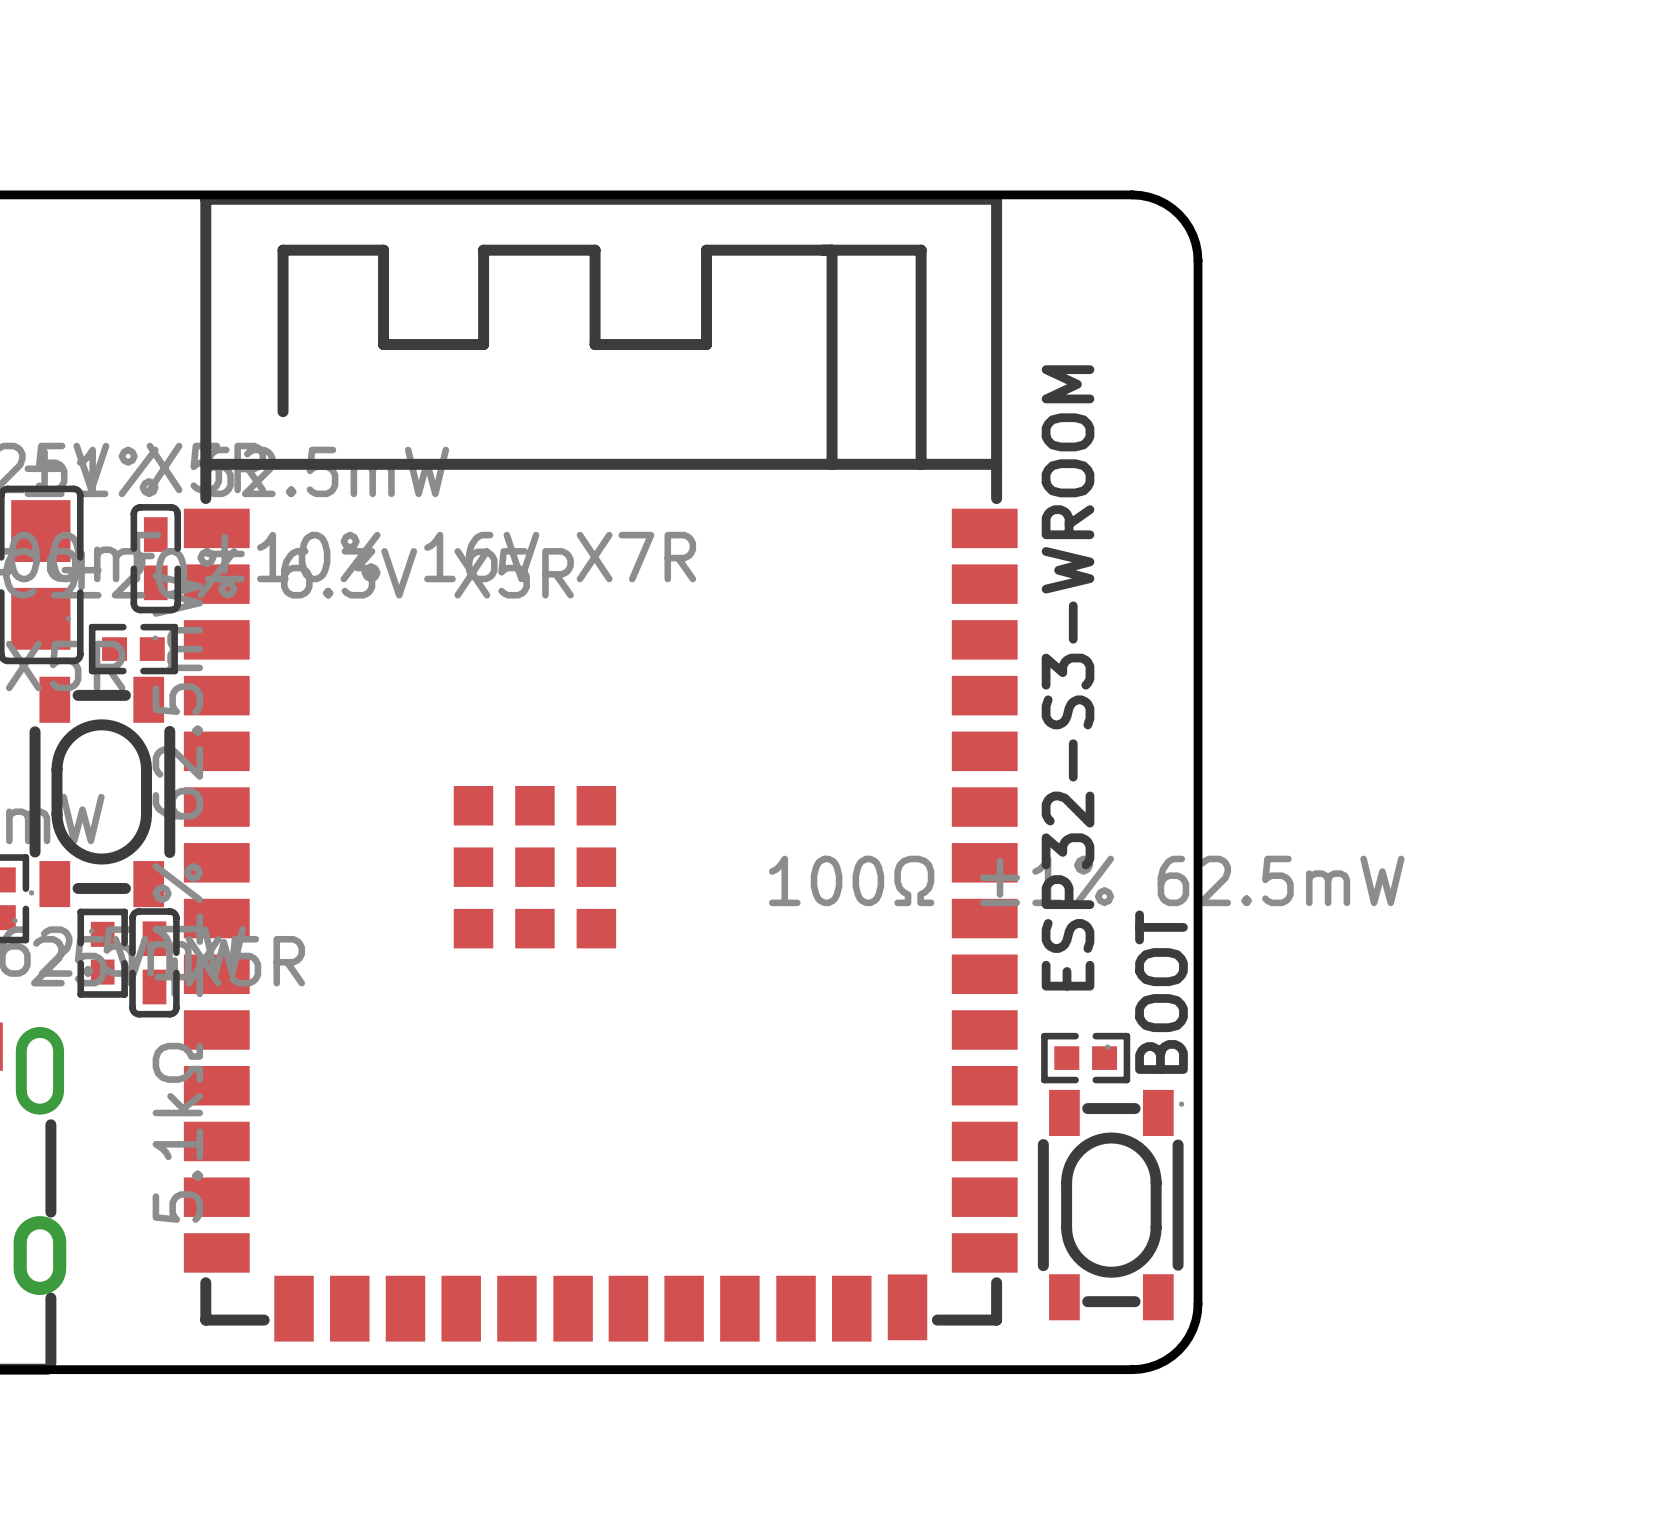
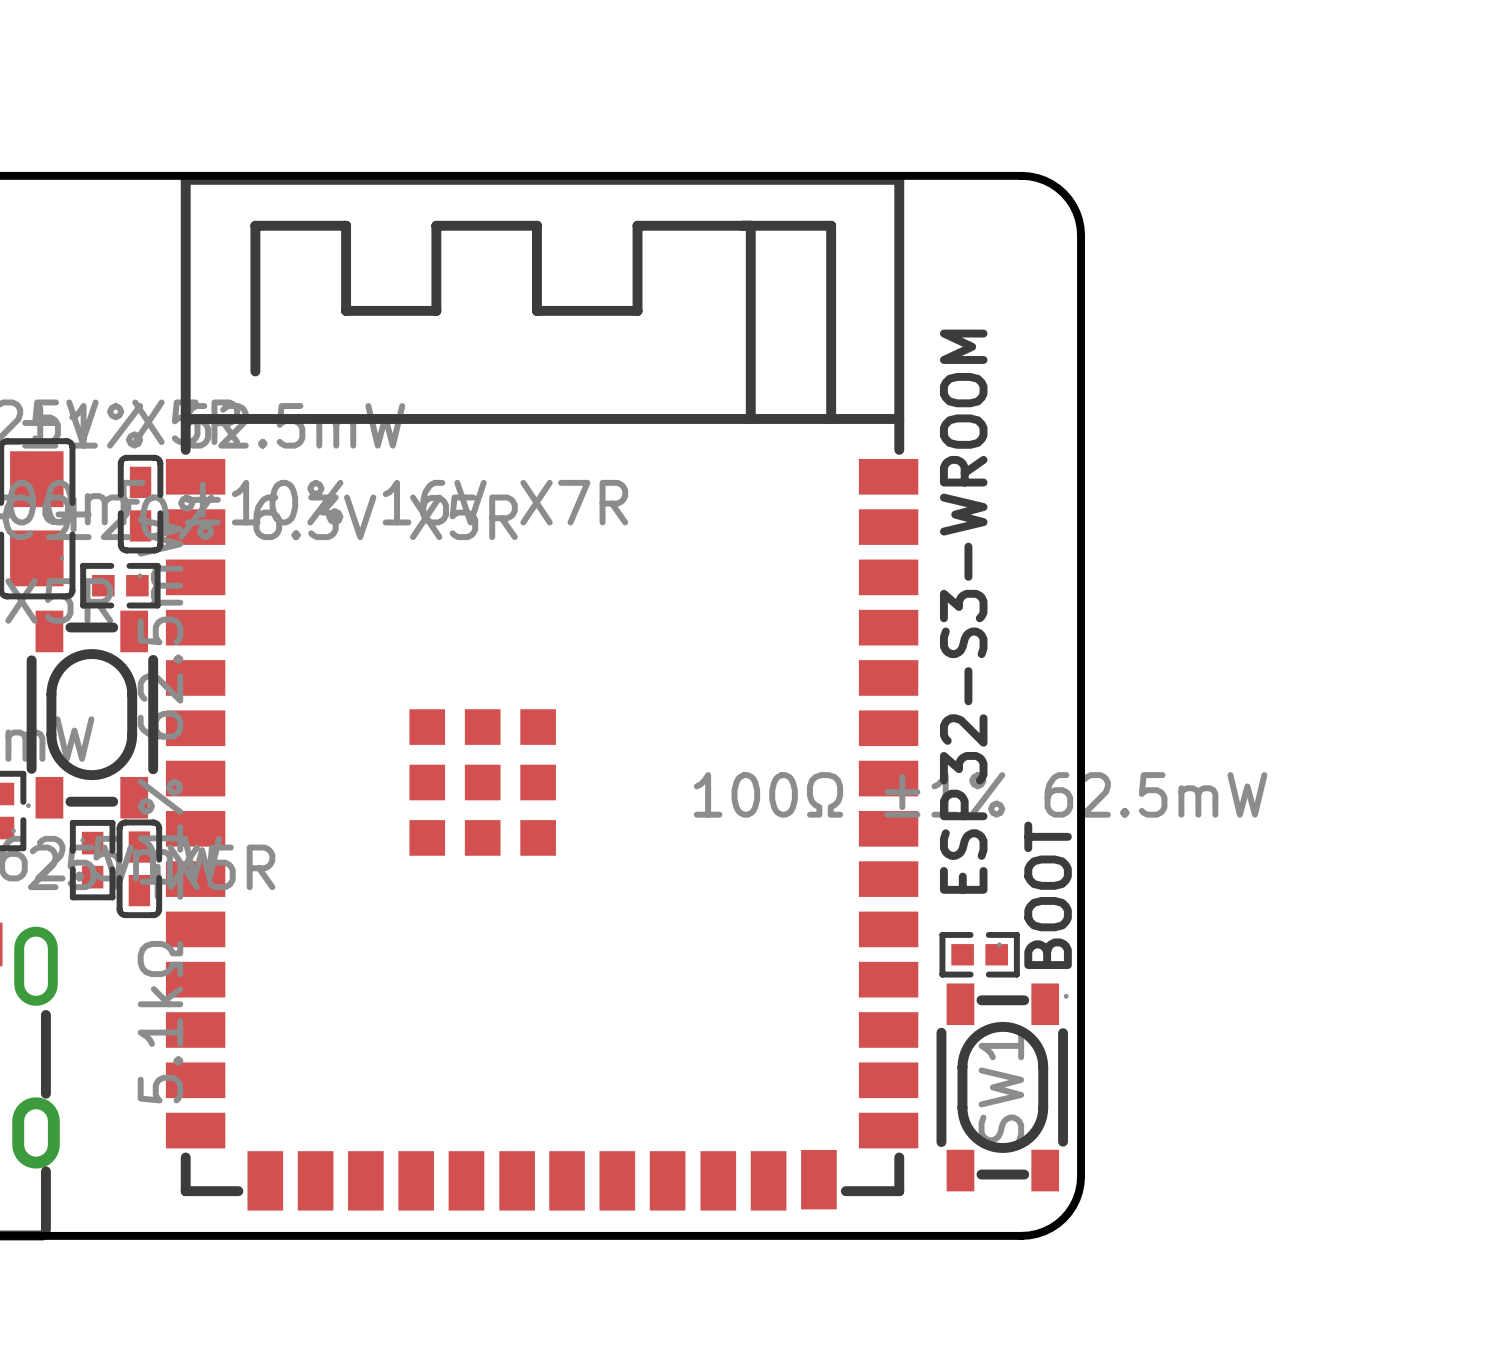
SW1 name: none -> SW1 (1001, 1087)

